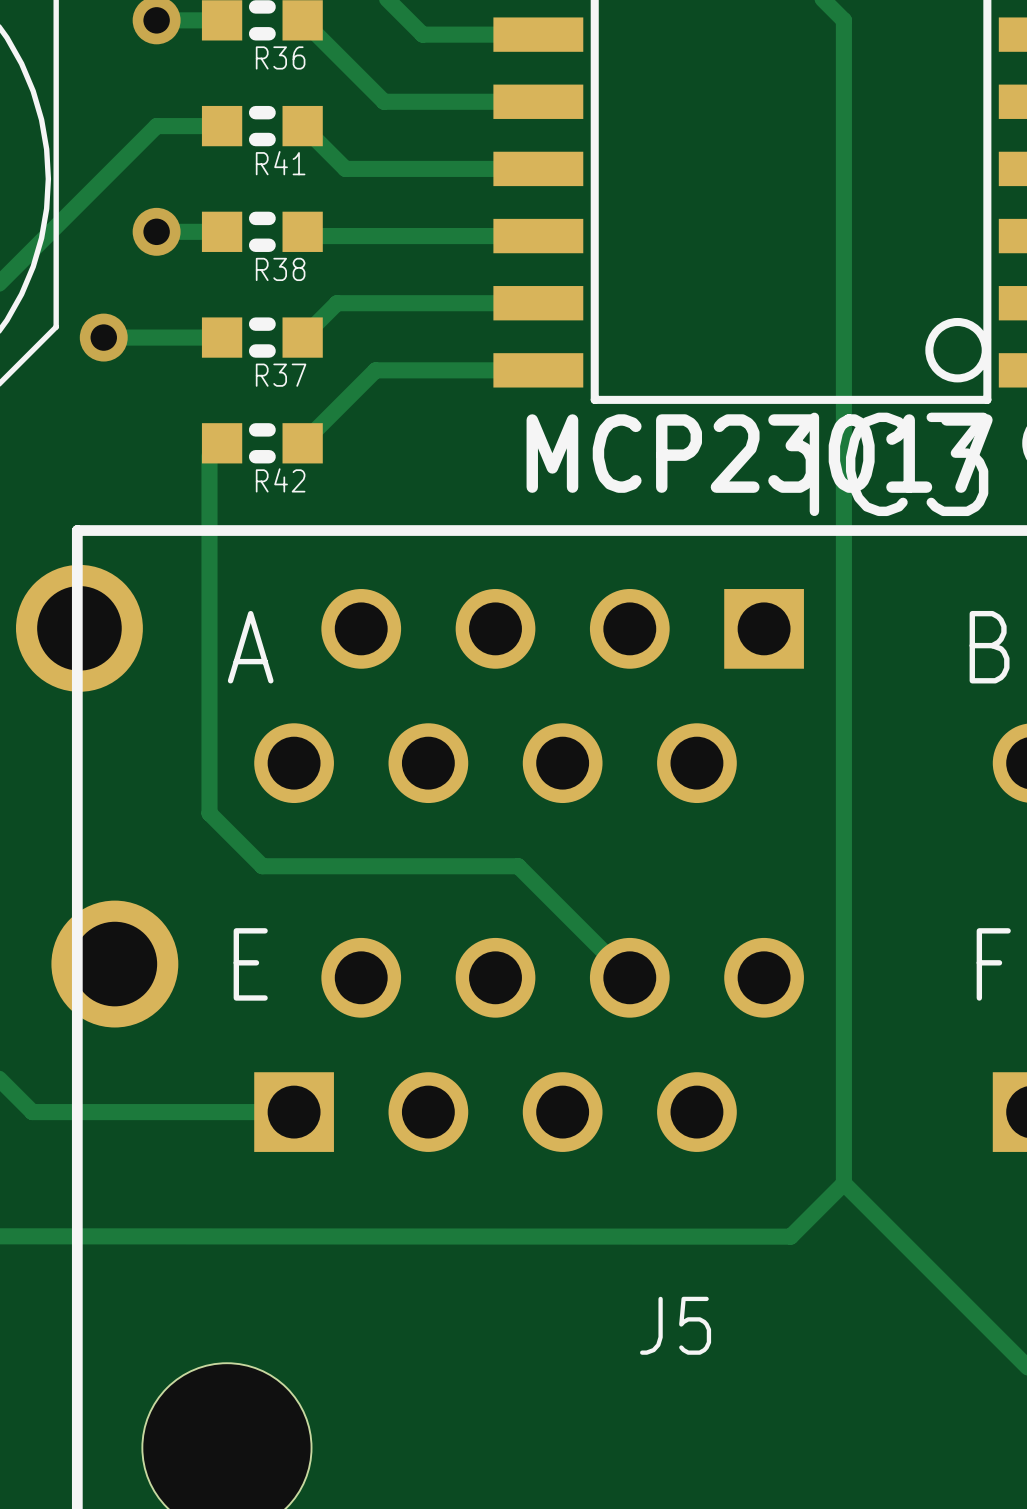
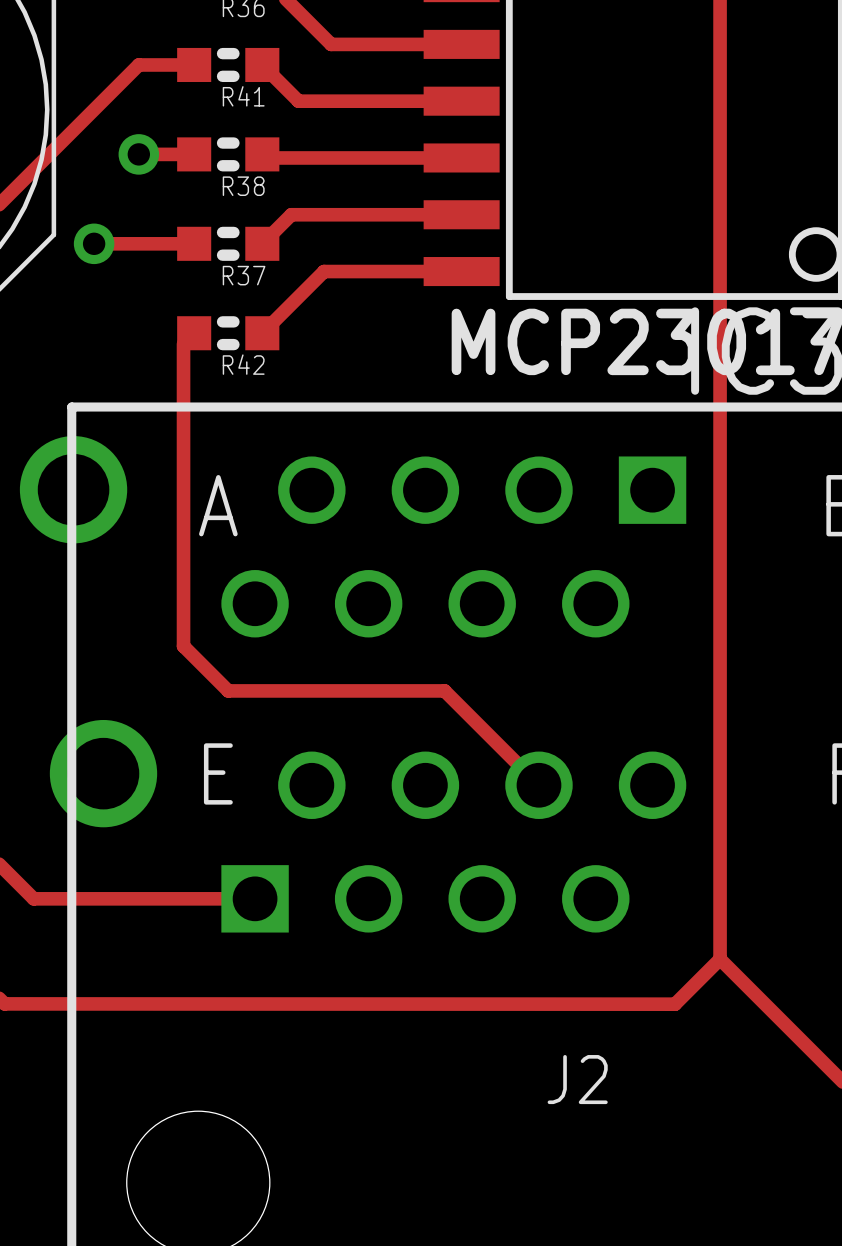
J5 name: J5 (675, 1325) -> J2 (577, 1079)

